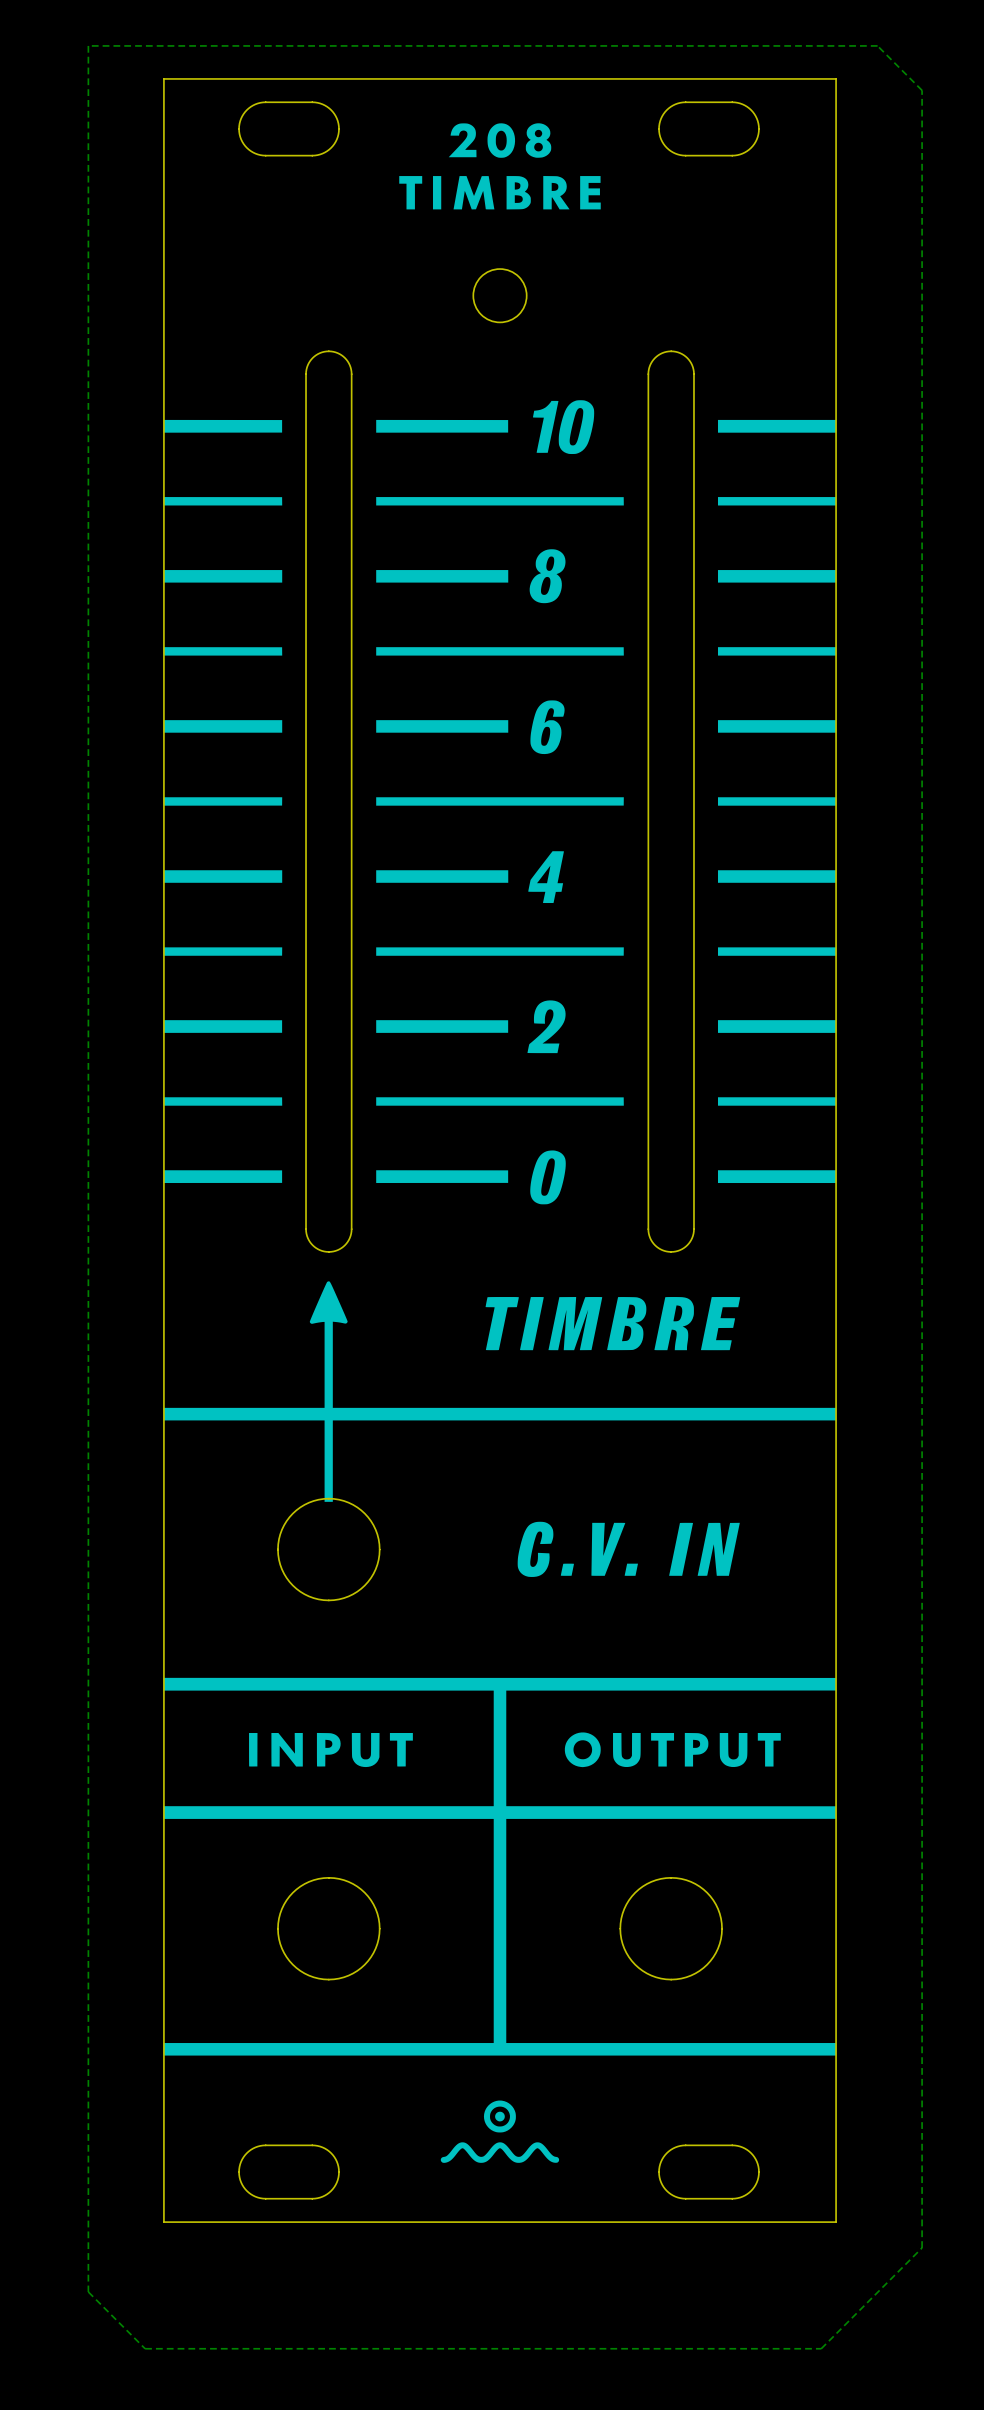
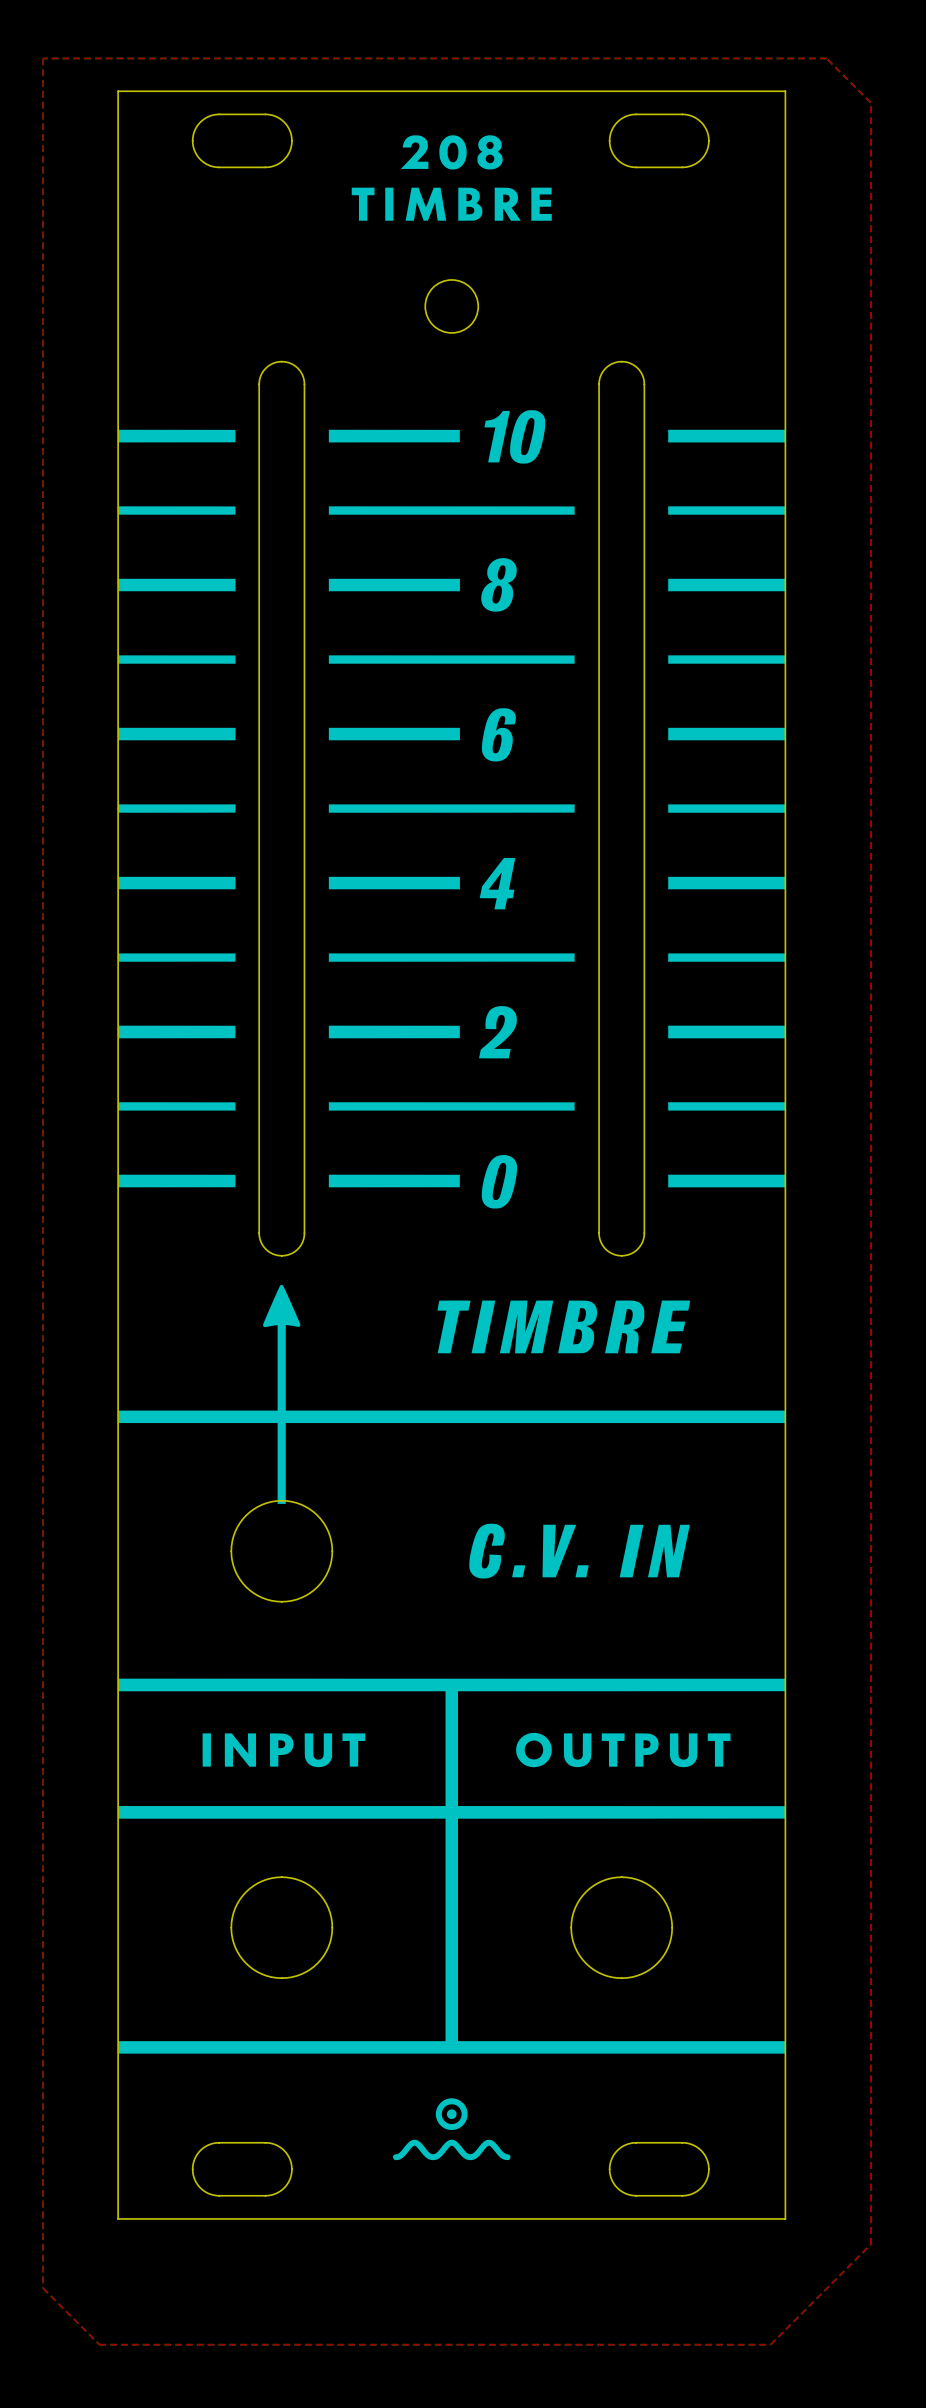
top zone outline: none -> (43, 58) (826, 58) (870, 102) (870, 2244) (770, 2344) (99, 2344) (43, 2288) (43, 58)

